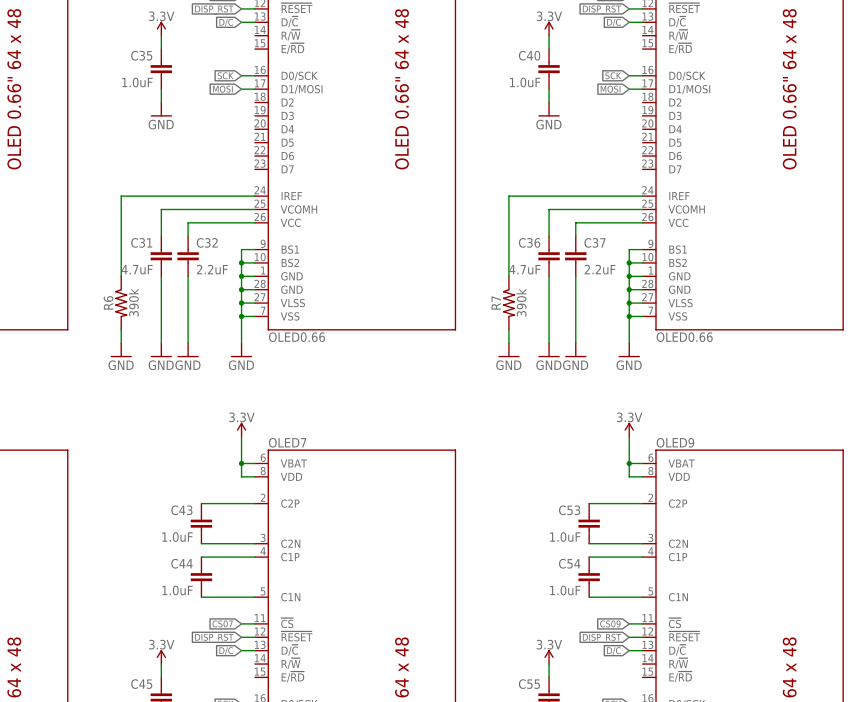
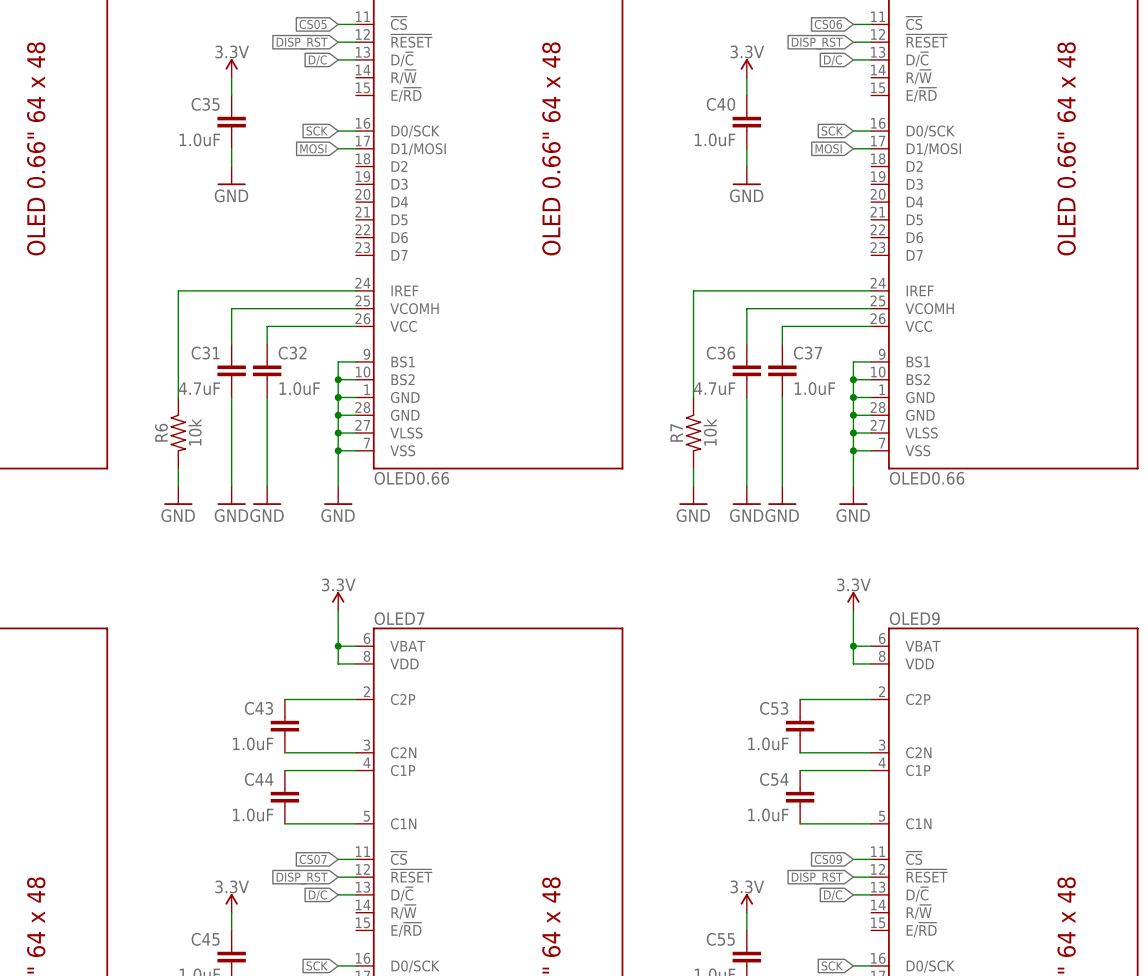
C32 value: 2.2uF (212, 269) -> 1.0uF (299, 388)
C37 value: 2.2uF (600, 269) -> 1.0uF (814, 388)
R6 value: 390k (133, 302) -> 10k (195, 432)
R7 value: 390k (521, 302) -> 10k (710, 432)

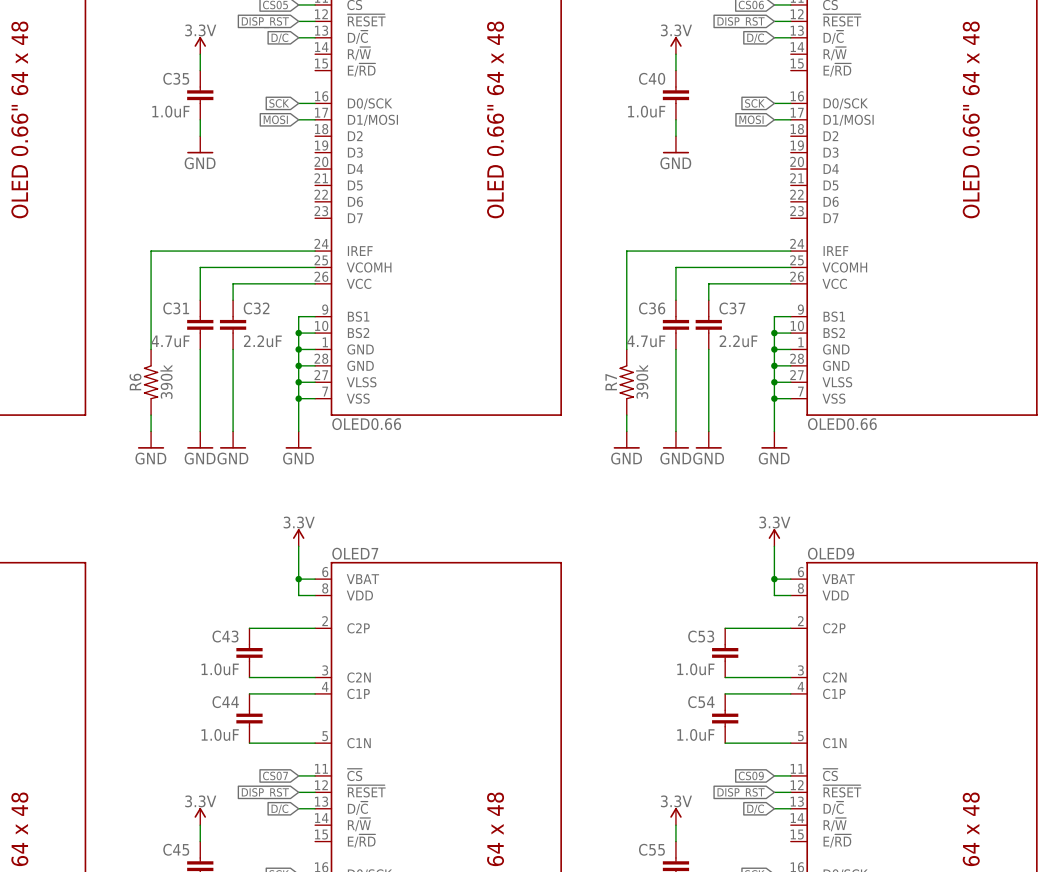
C32 value: 1.0uF (299, 388) -> 2.2uF (262, 341)
C37 value: 1.0uF (814, 388) -> 2.2uF (738, 341)
R6 value: 10k (195, 432) -> 390k (166, 381)
R7 value: 10k (710, 432) -> 390k (642, 381)

